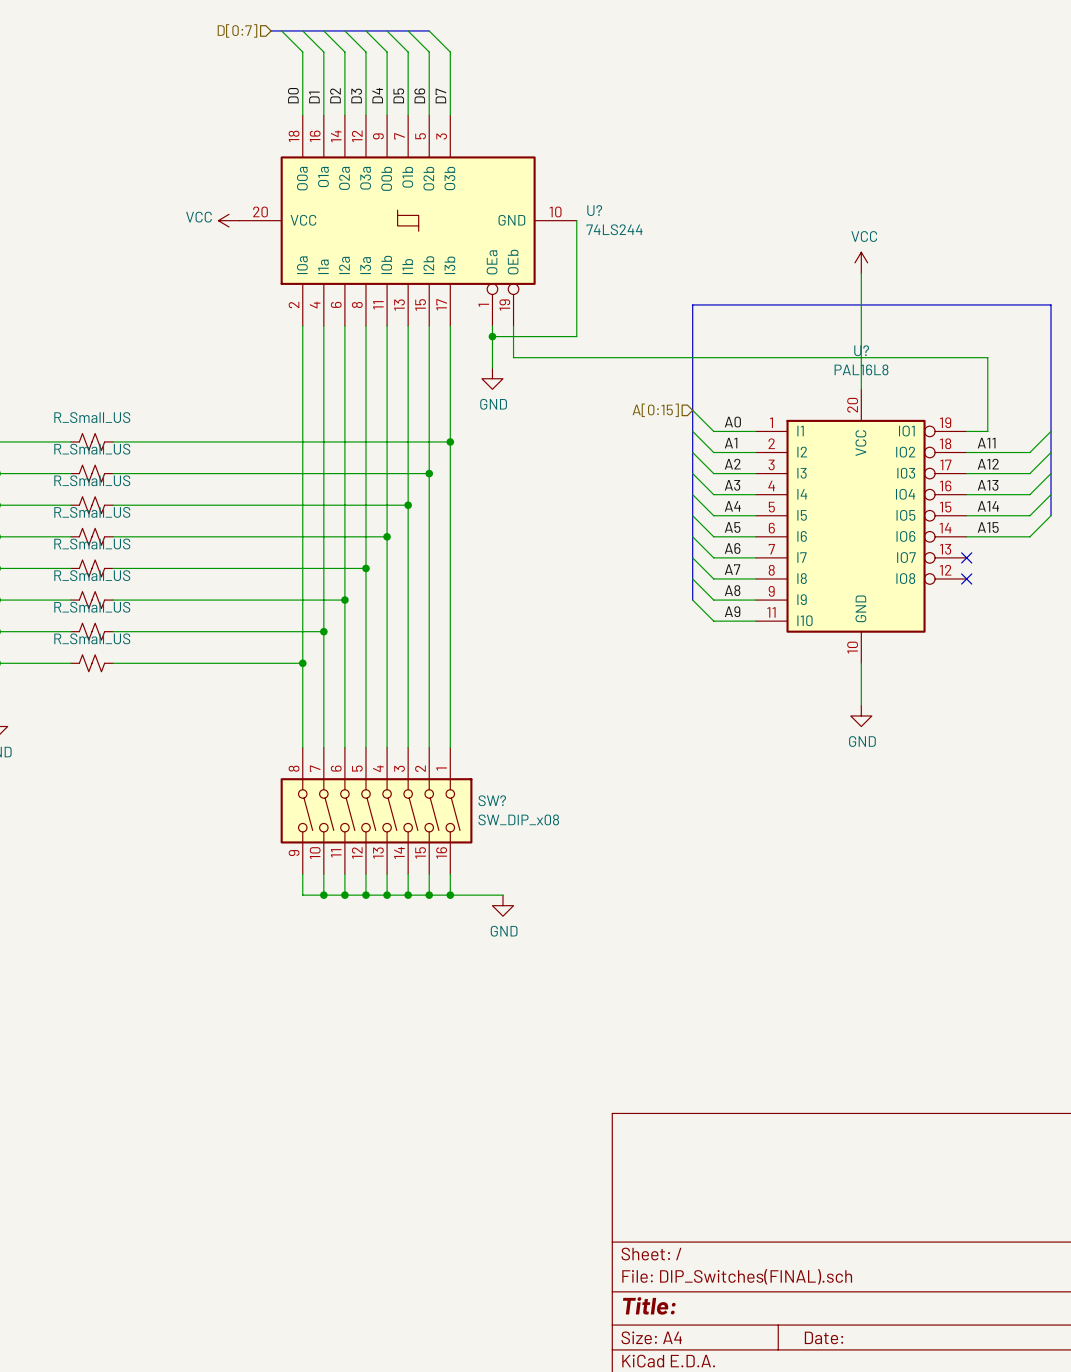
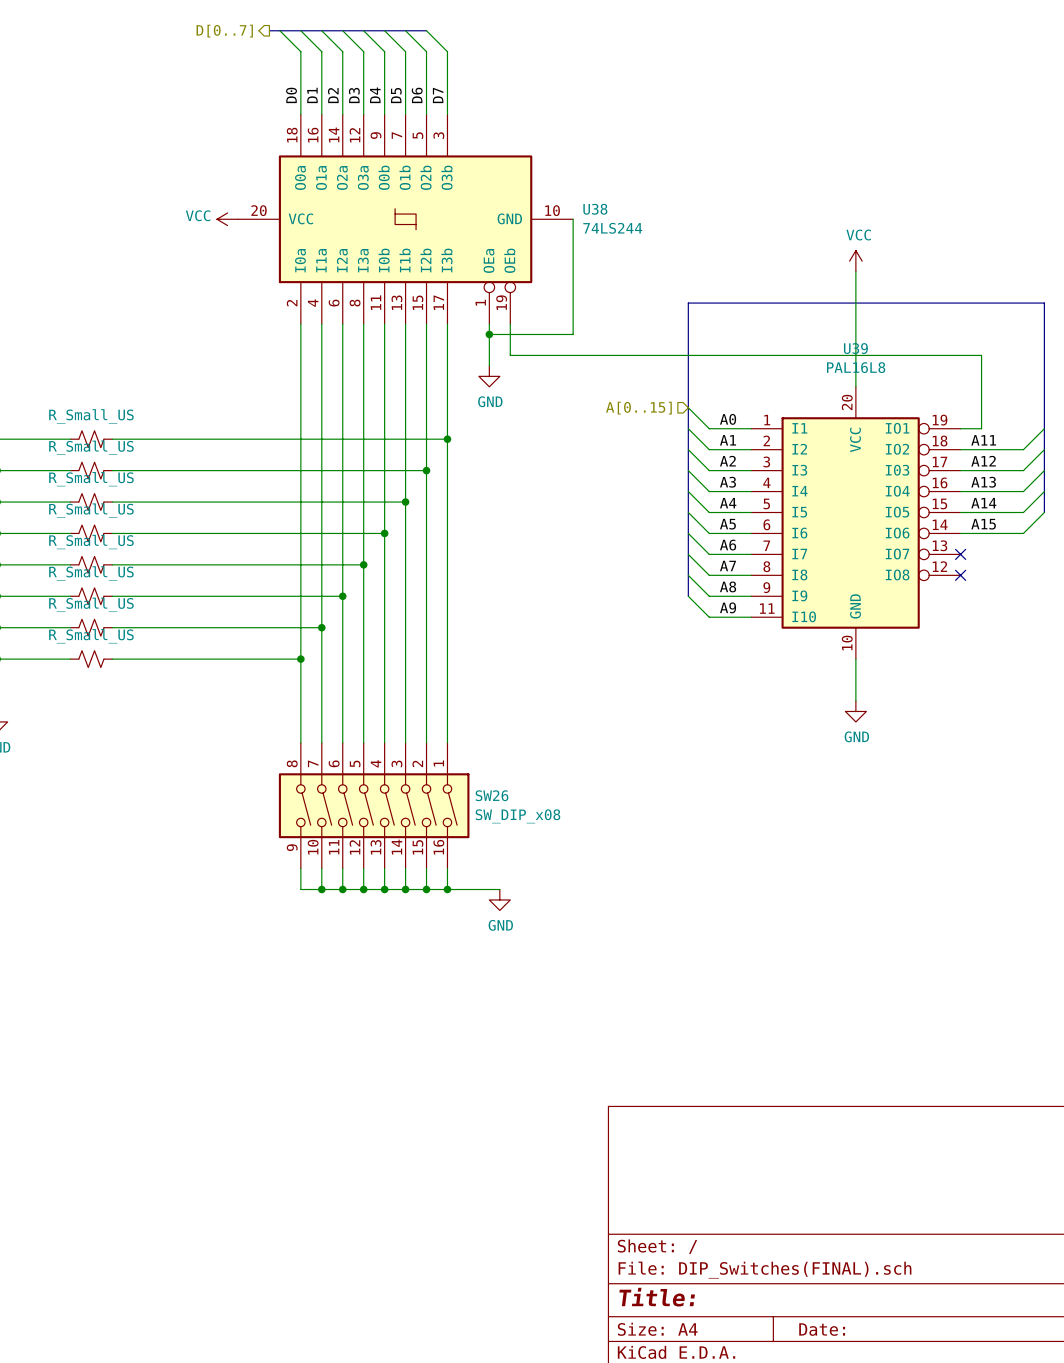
hierarchical label shape: input (237, 30) -> output (224, 31)
hierarchical label: D[0:7] (237, 30) -> D[0..7] (224, 31)
U? name: U? (594, 210) -> U38 (595, 209)
U? name: U? (861, 350) -> U39 (855, 348)
hierarchical label: A[0:15] (655, 410) -> A[0..15] (638, 408)
SW? name: SW? (492, 800) -> SW26 (492, 795)

